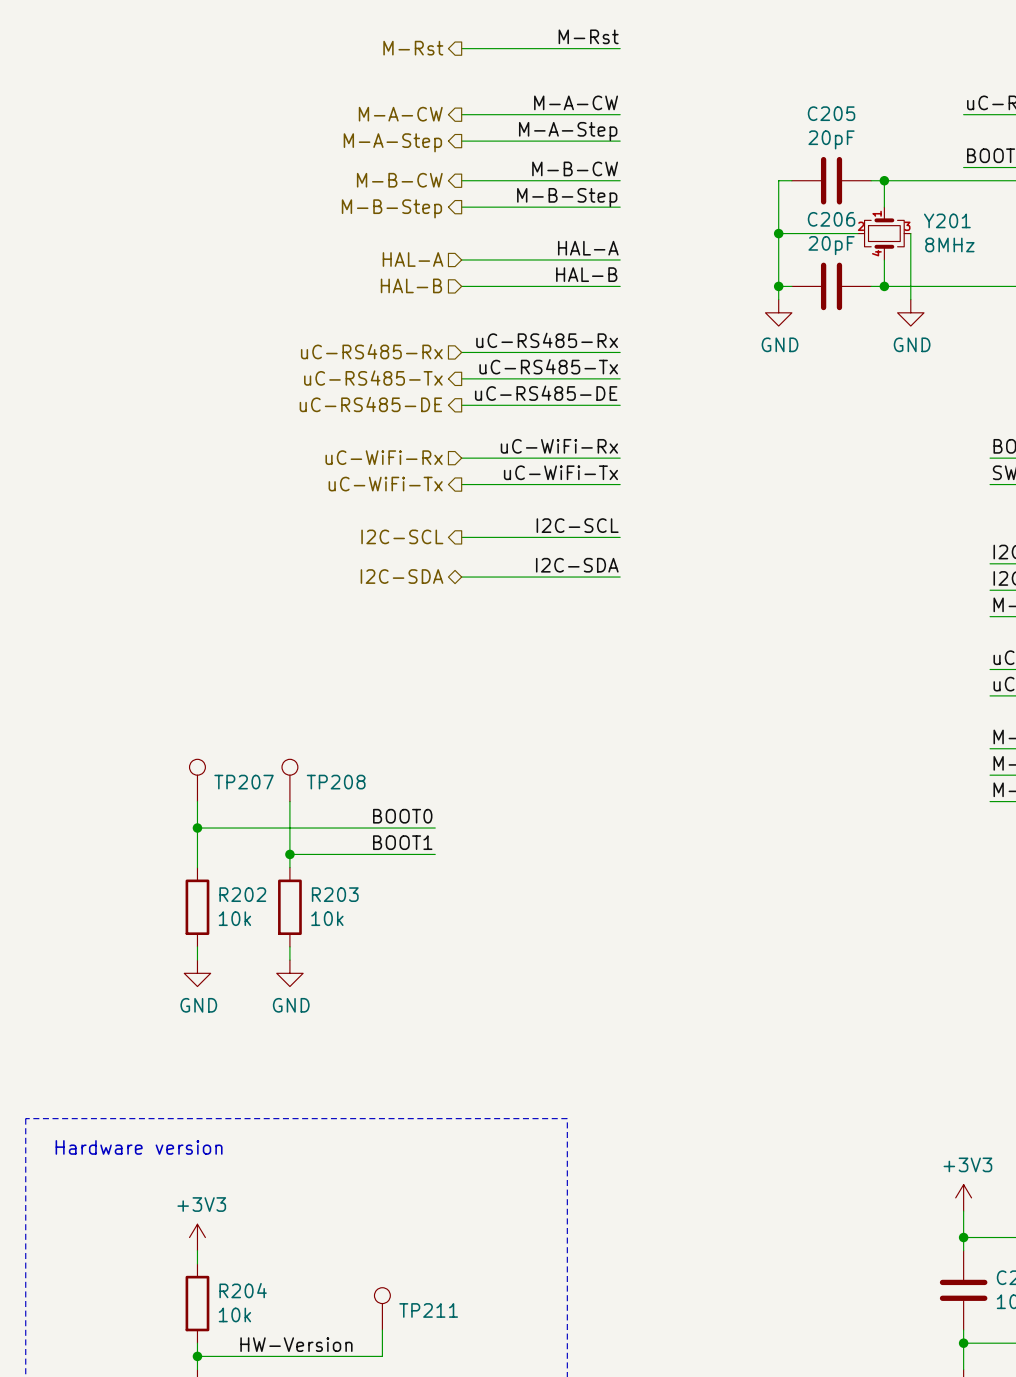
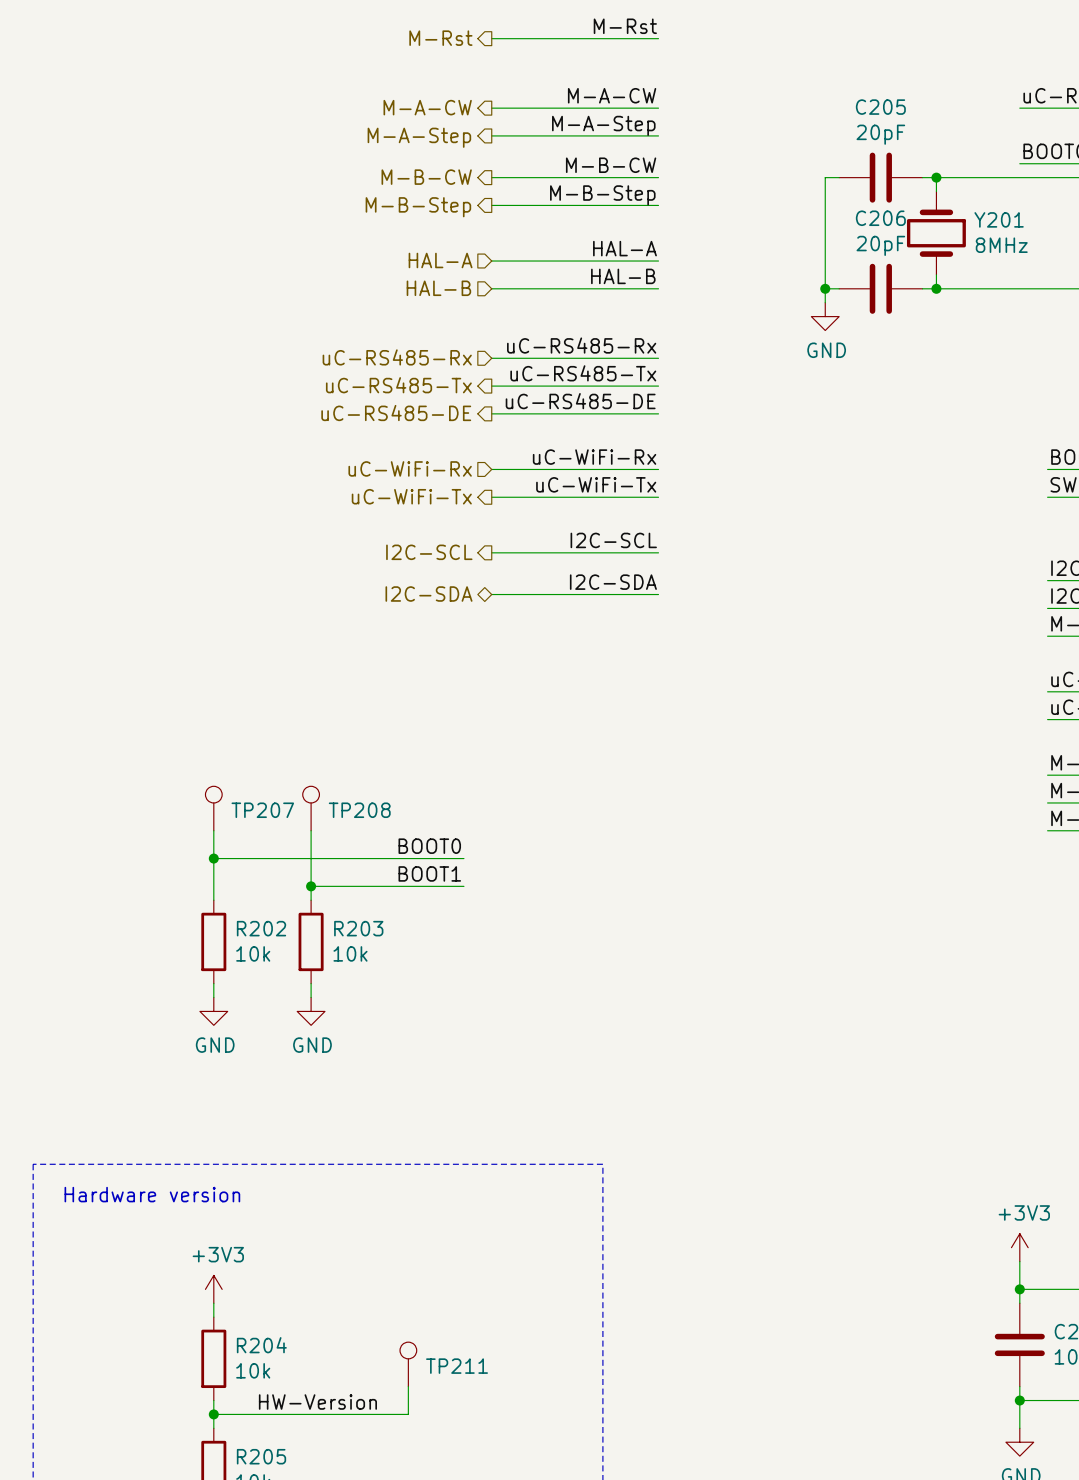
Y201 symbol: [857, 207, 911, 260] -> [906, 191, 966, 275]
wire: (778, 233) (857, 233) -> none
junction: (778, 233) -> none
wire: (910, 233) (910, 299) -> none
power symbol: GND (910, 312) -> none

